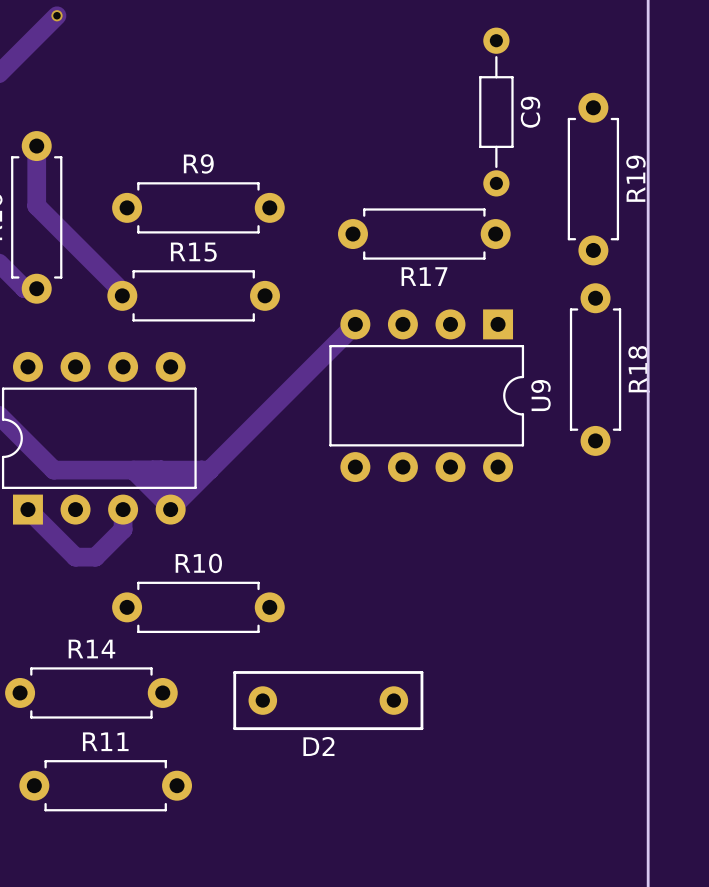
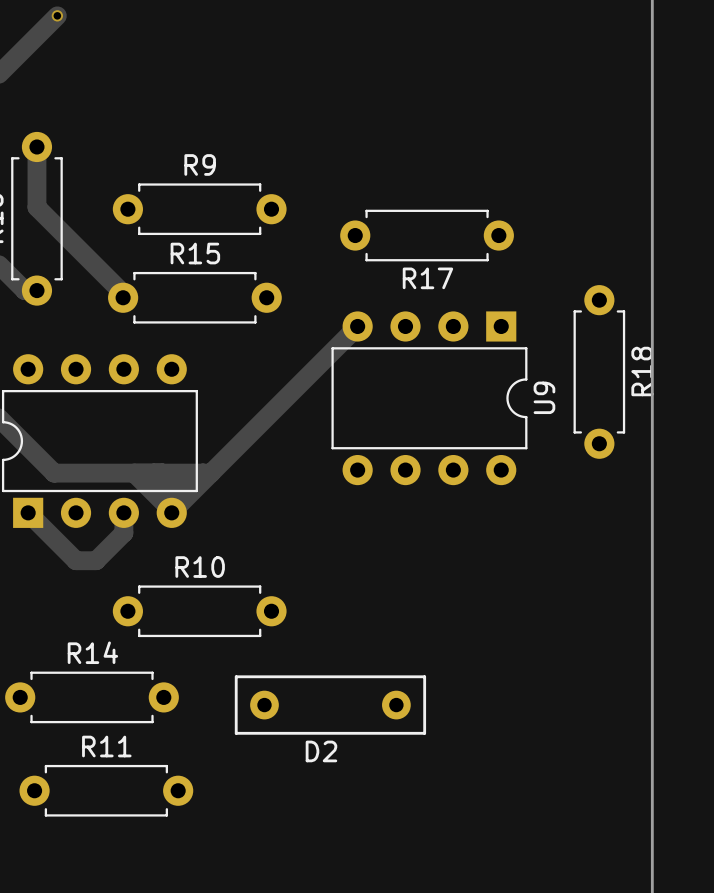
C9: (496, 112) -> none
R19: (593, 179) -> none

